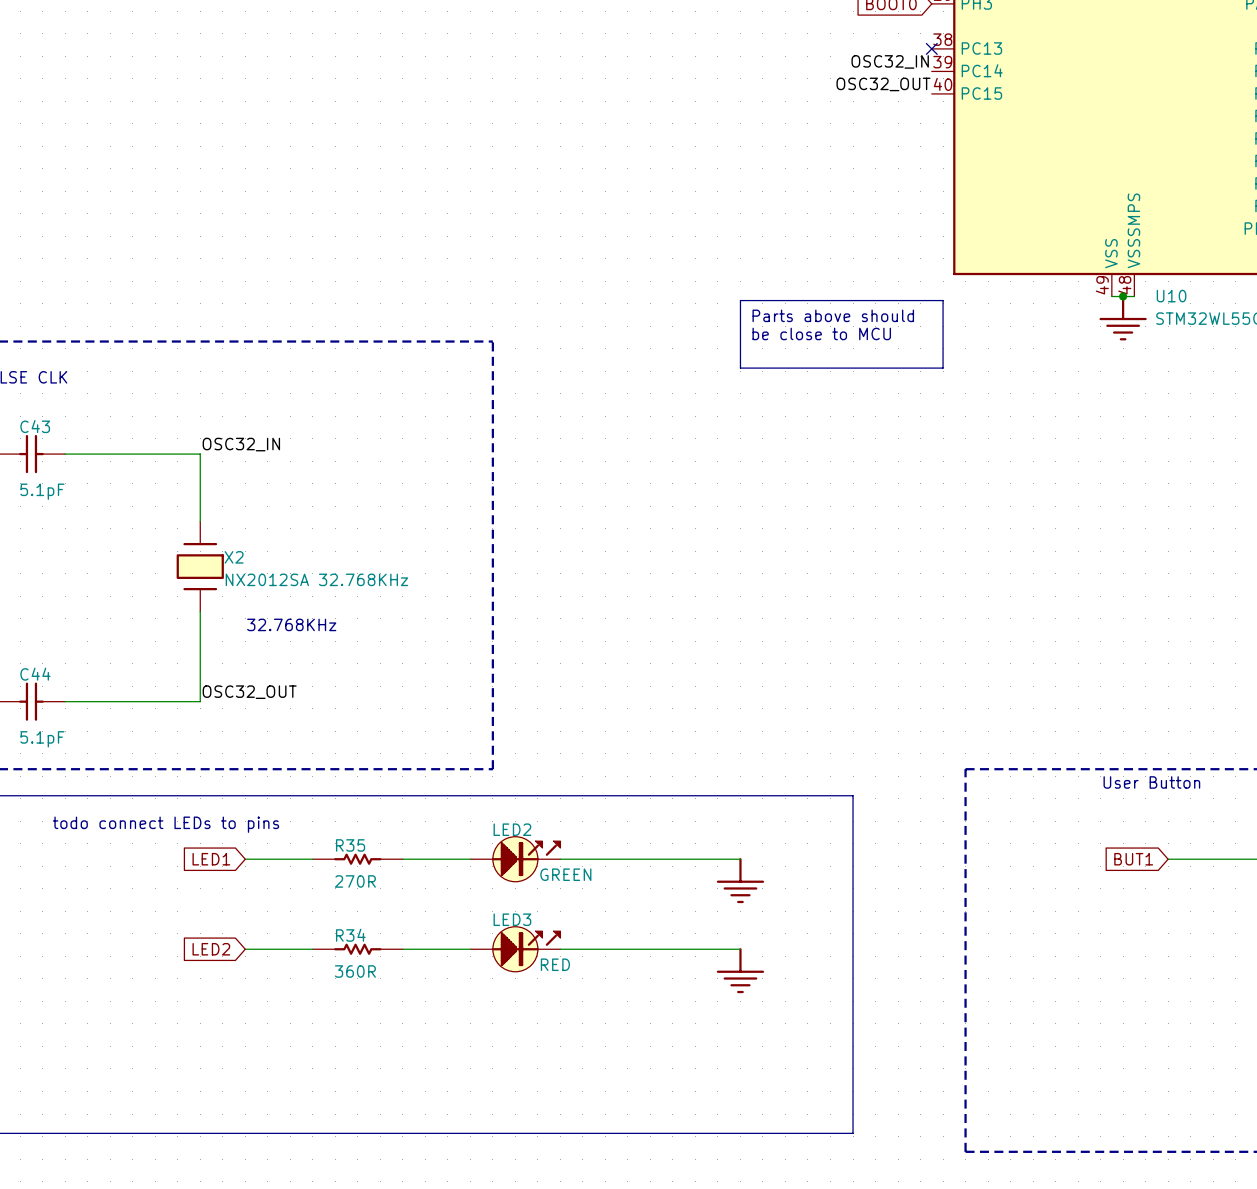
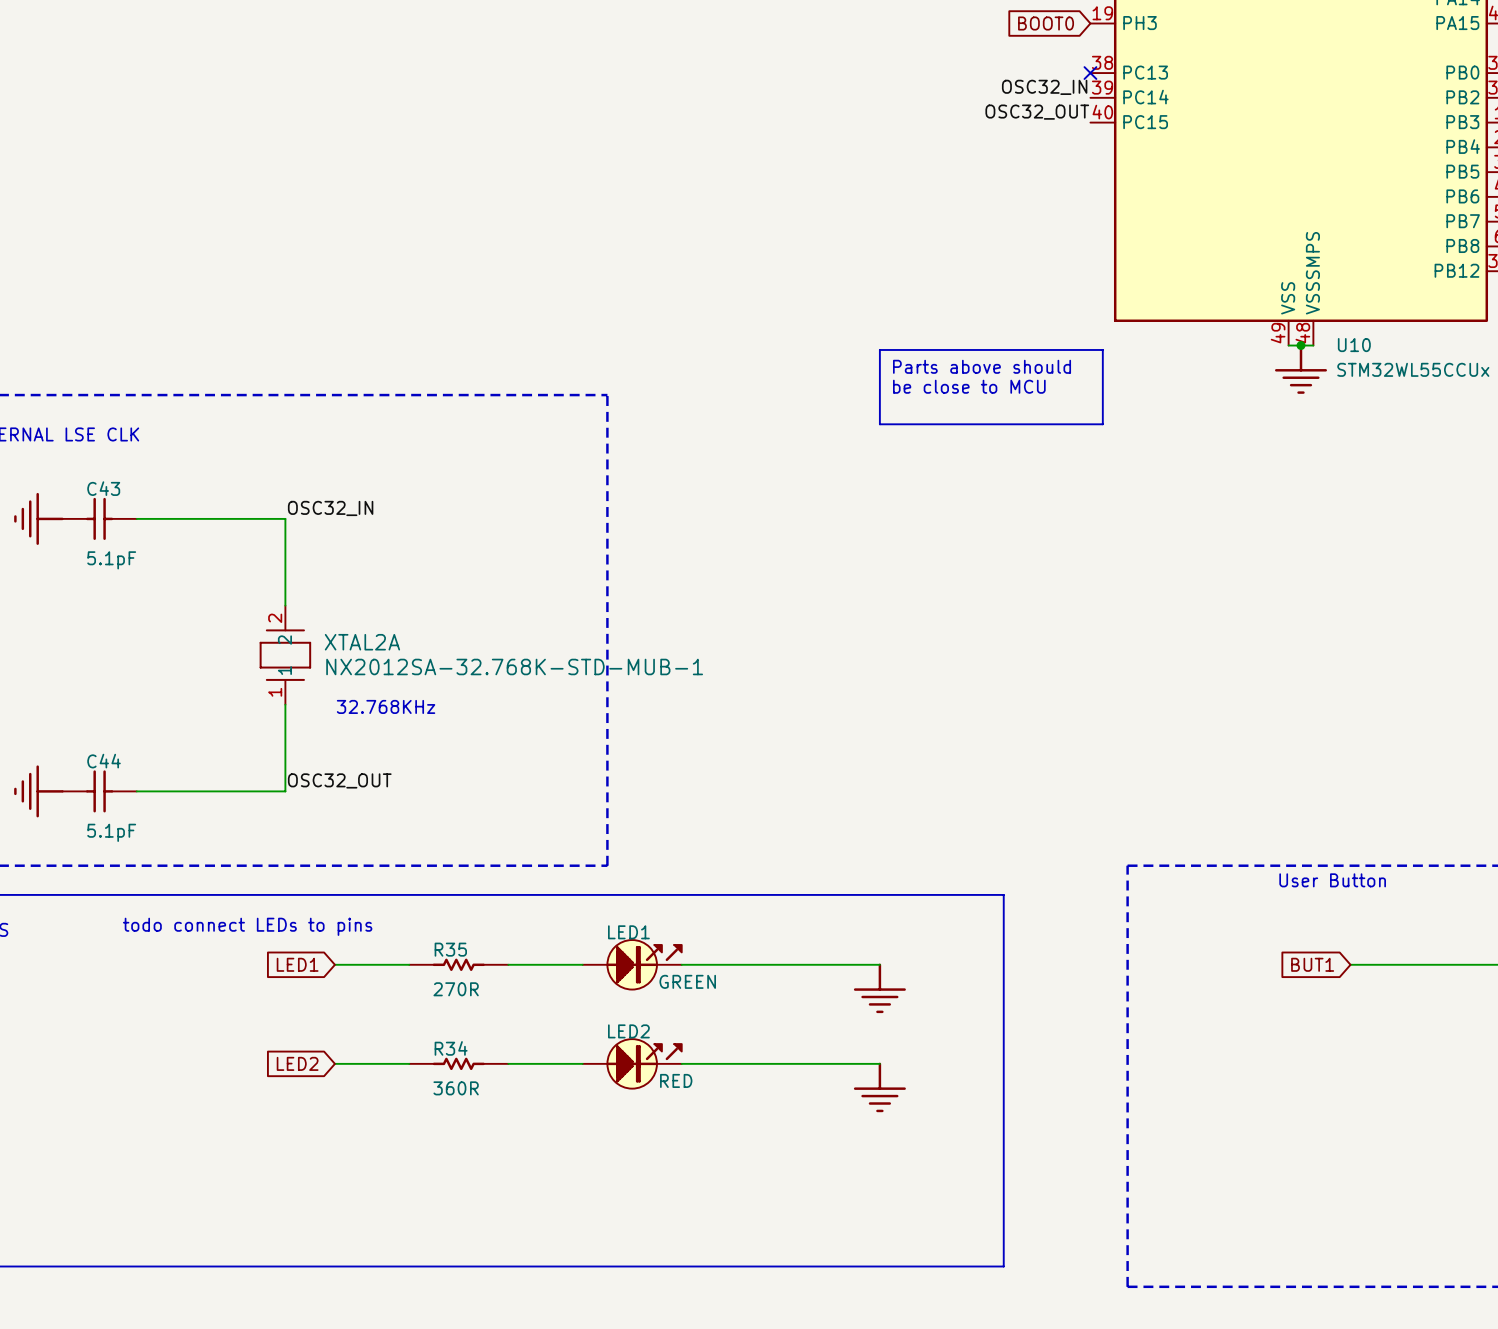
X2: (200, 566) -> none
XTAL2A: none -> NX2012SA-32.768K-STD-MUB-1 (285, 655)
LED2 name: LED2 (512, 829) -> LED1 (628, 932)
LED3 name: LED3 (512, 919) -> LED2 (628, 1031)

